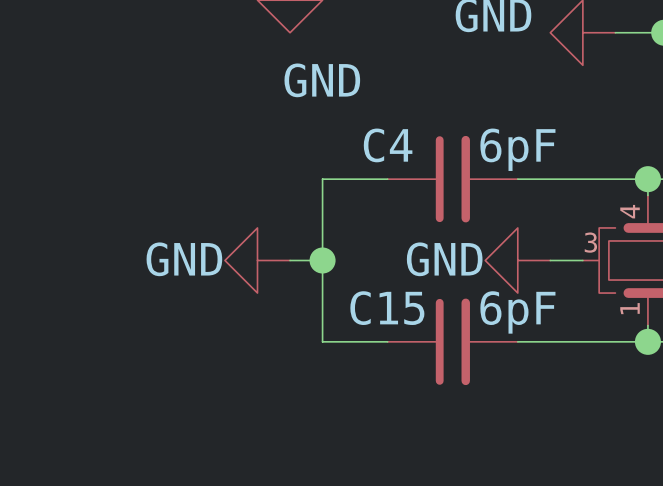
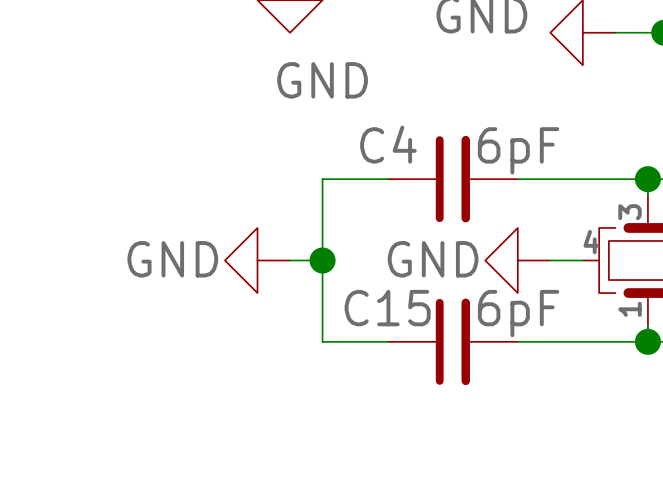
part pin number: 4 (630, 211) -> 3 (630, 212)
part pin number: 3 (590, 242) -> 4 (591, 242)

